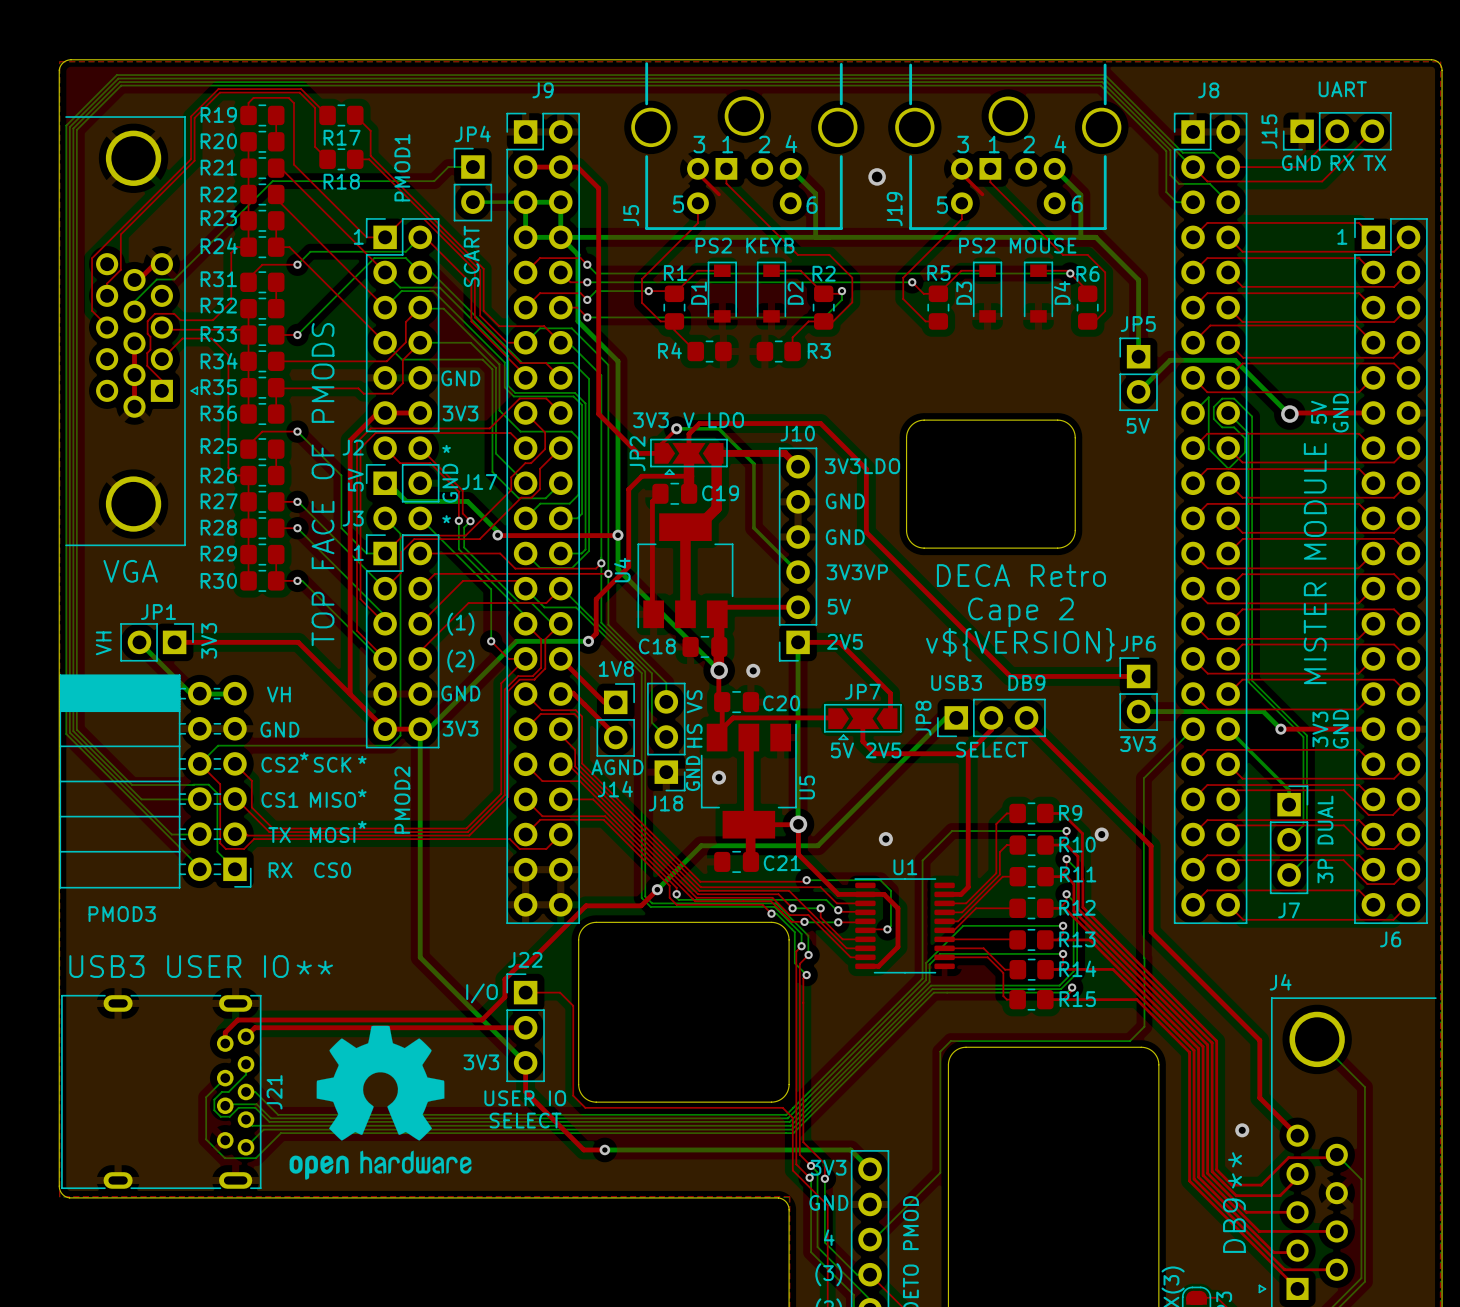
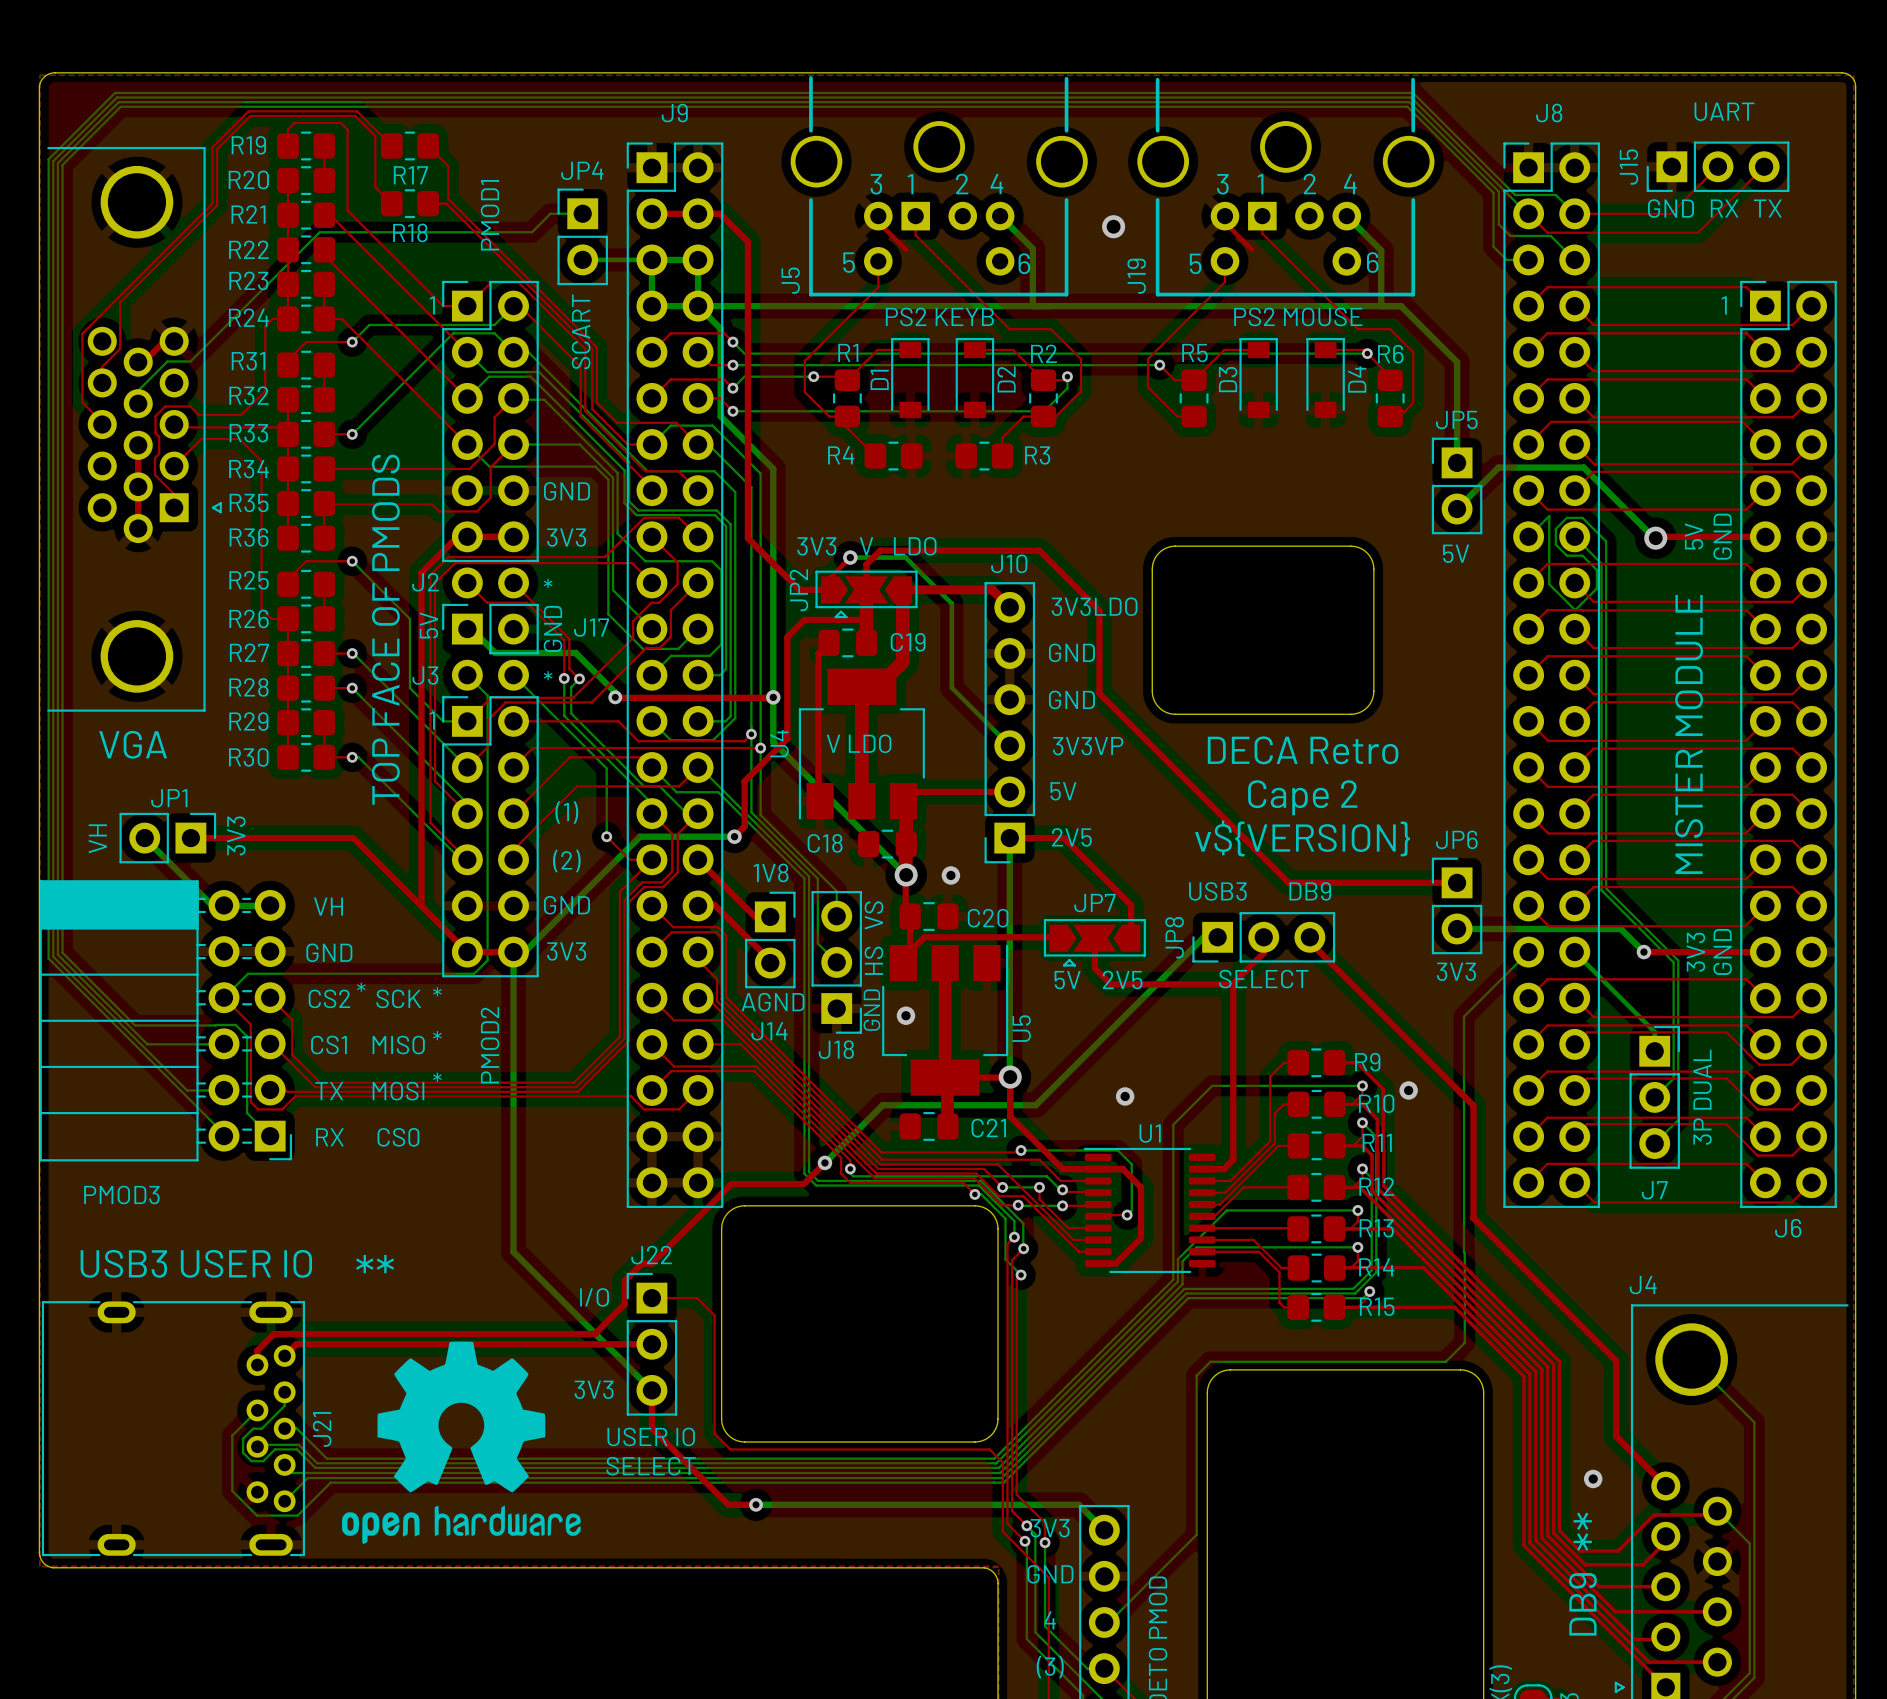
text: none -> V LDO (859, 743)

